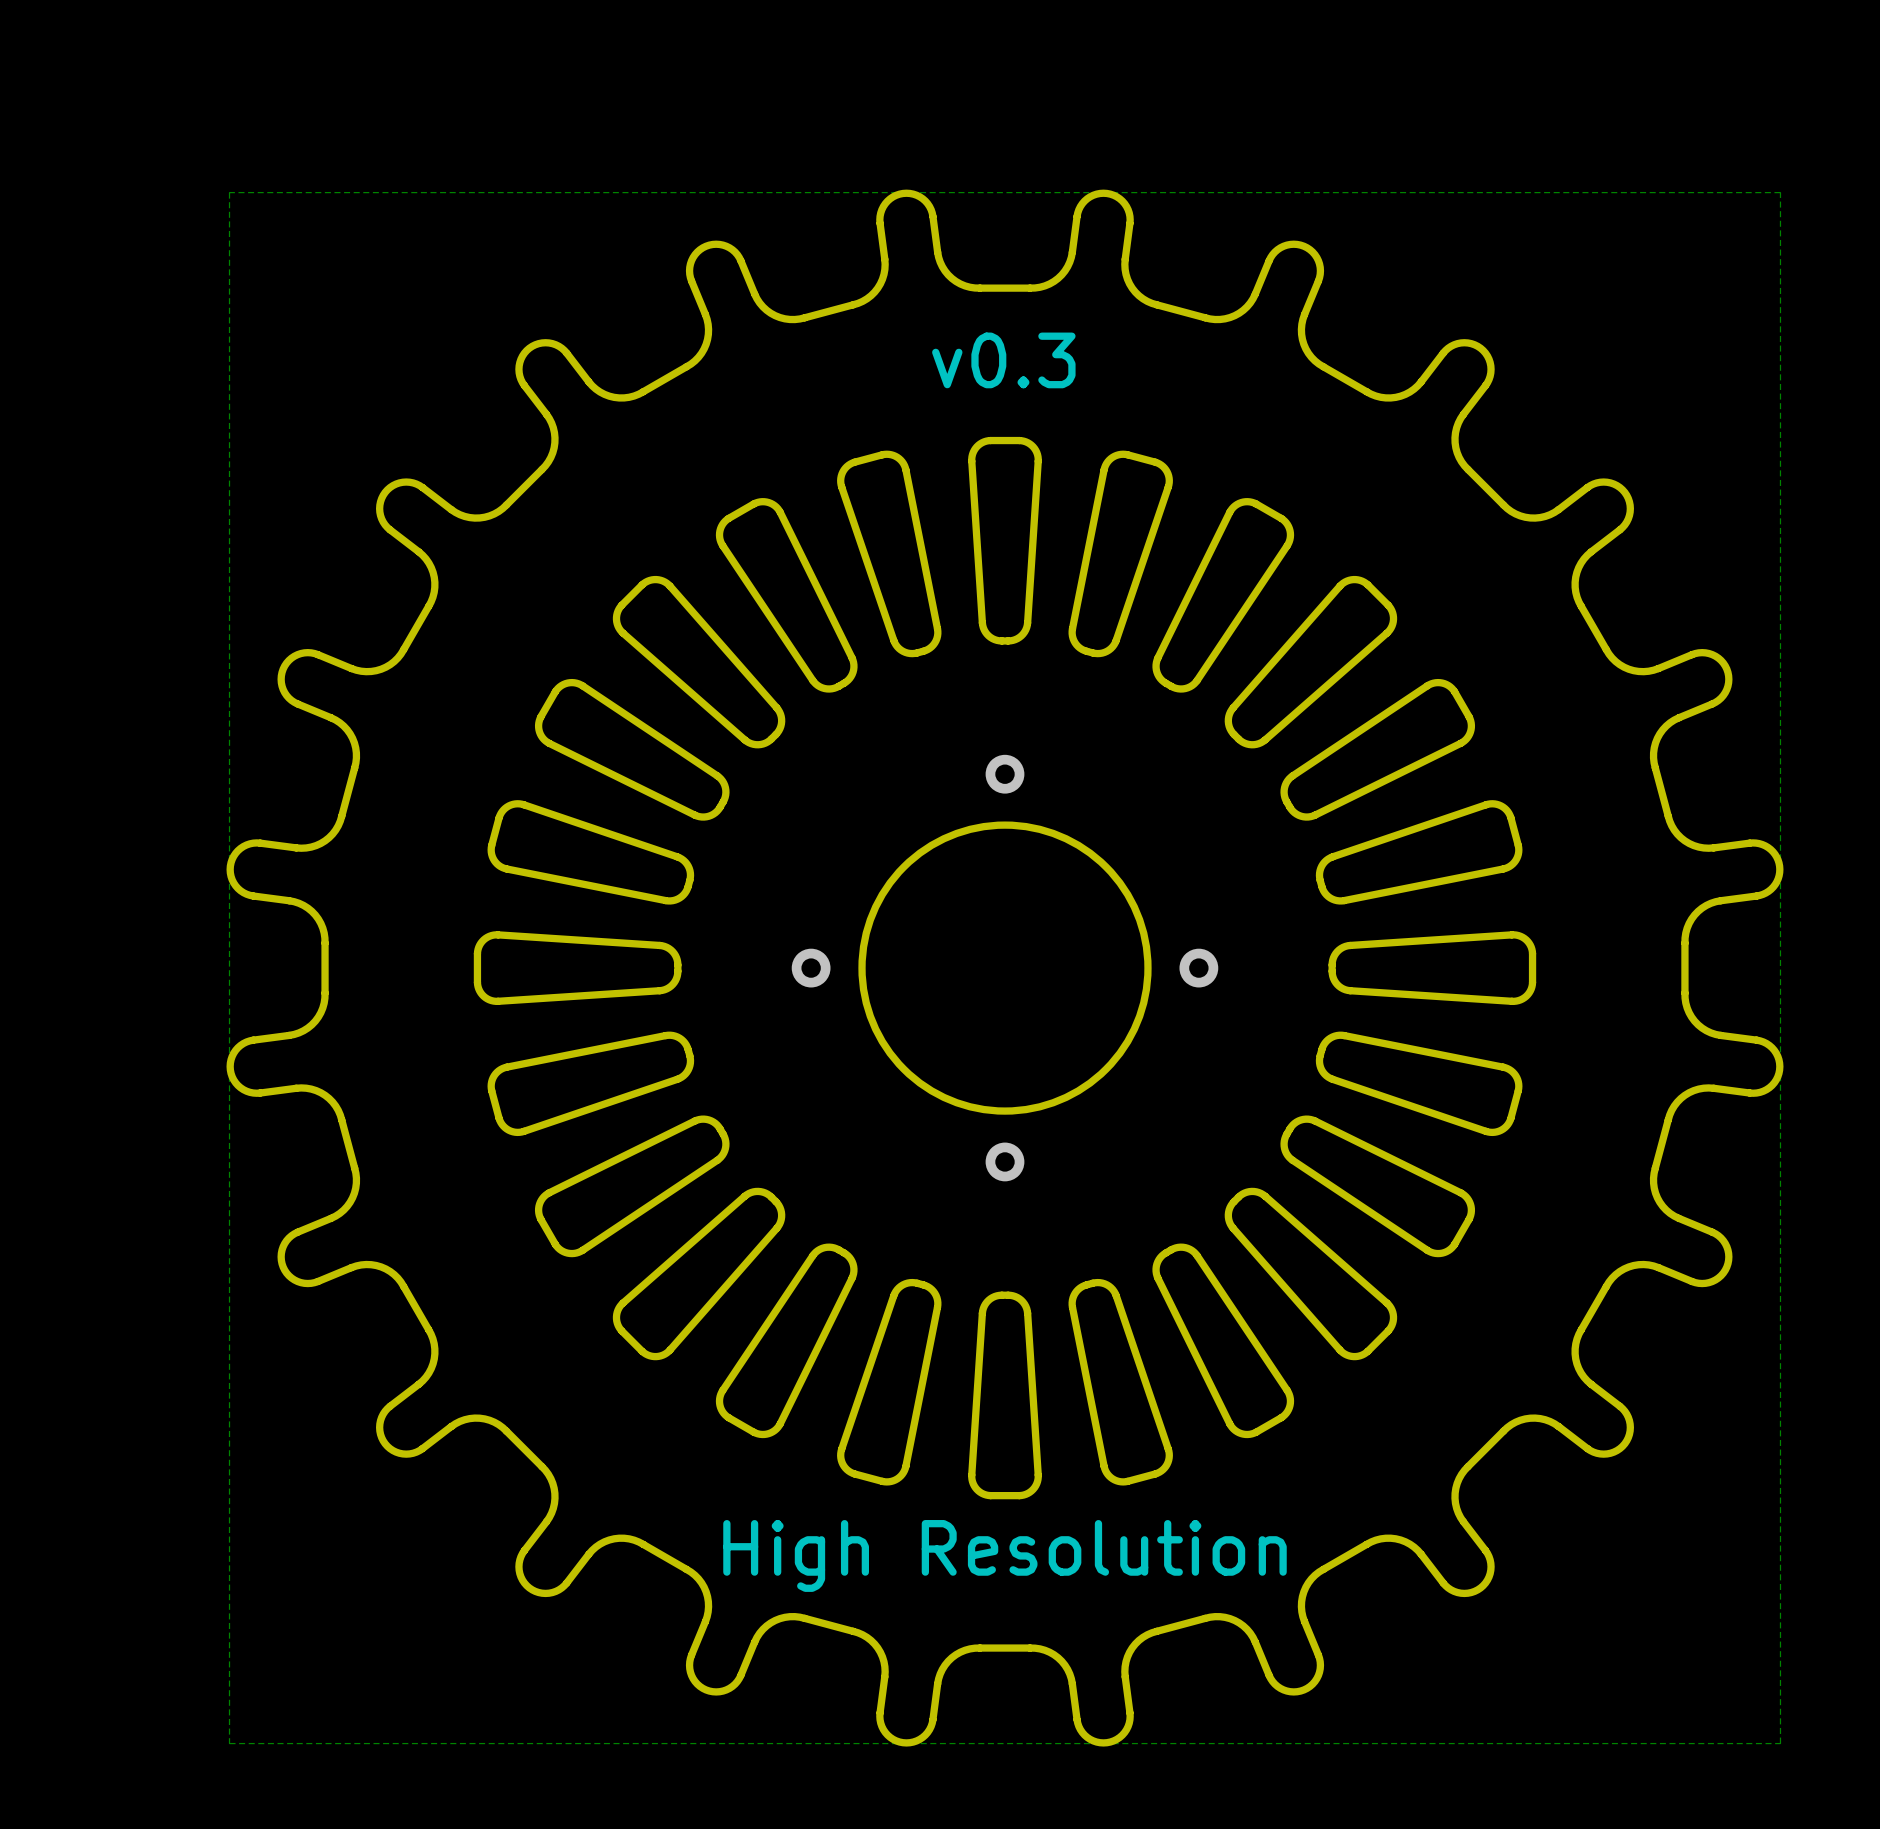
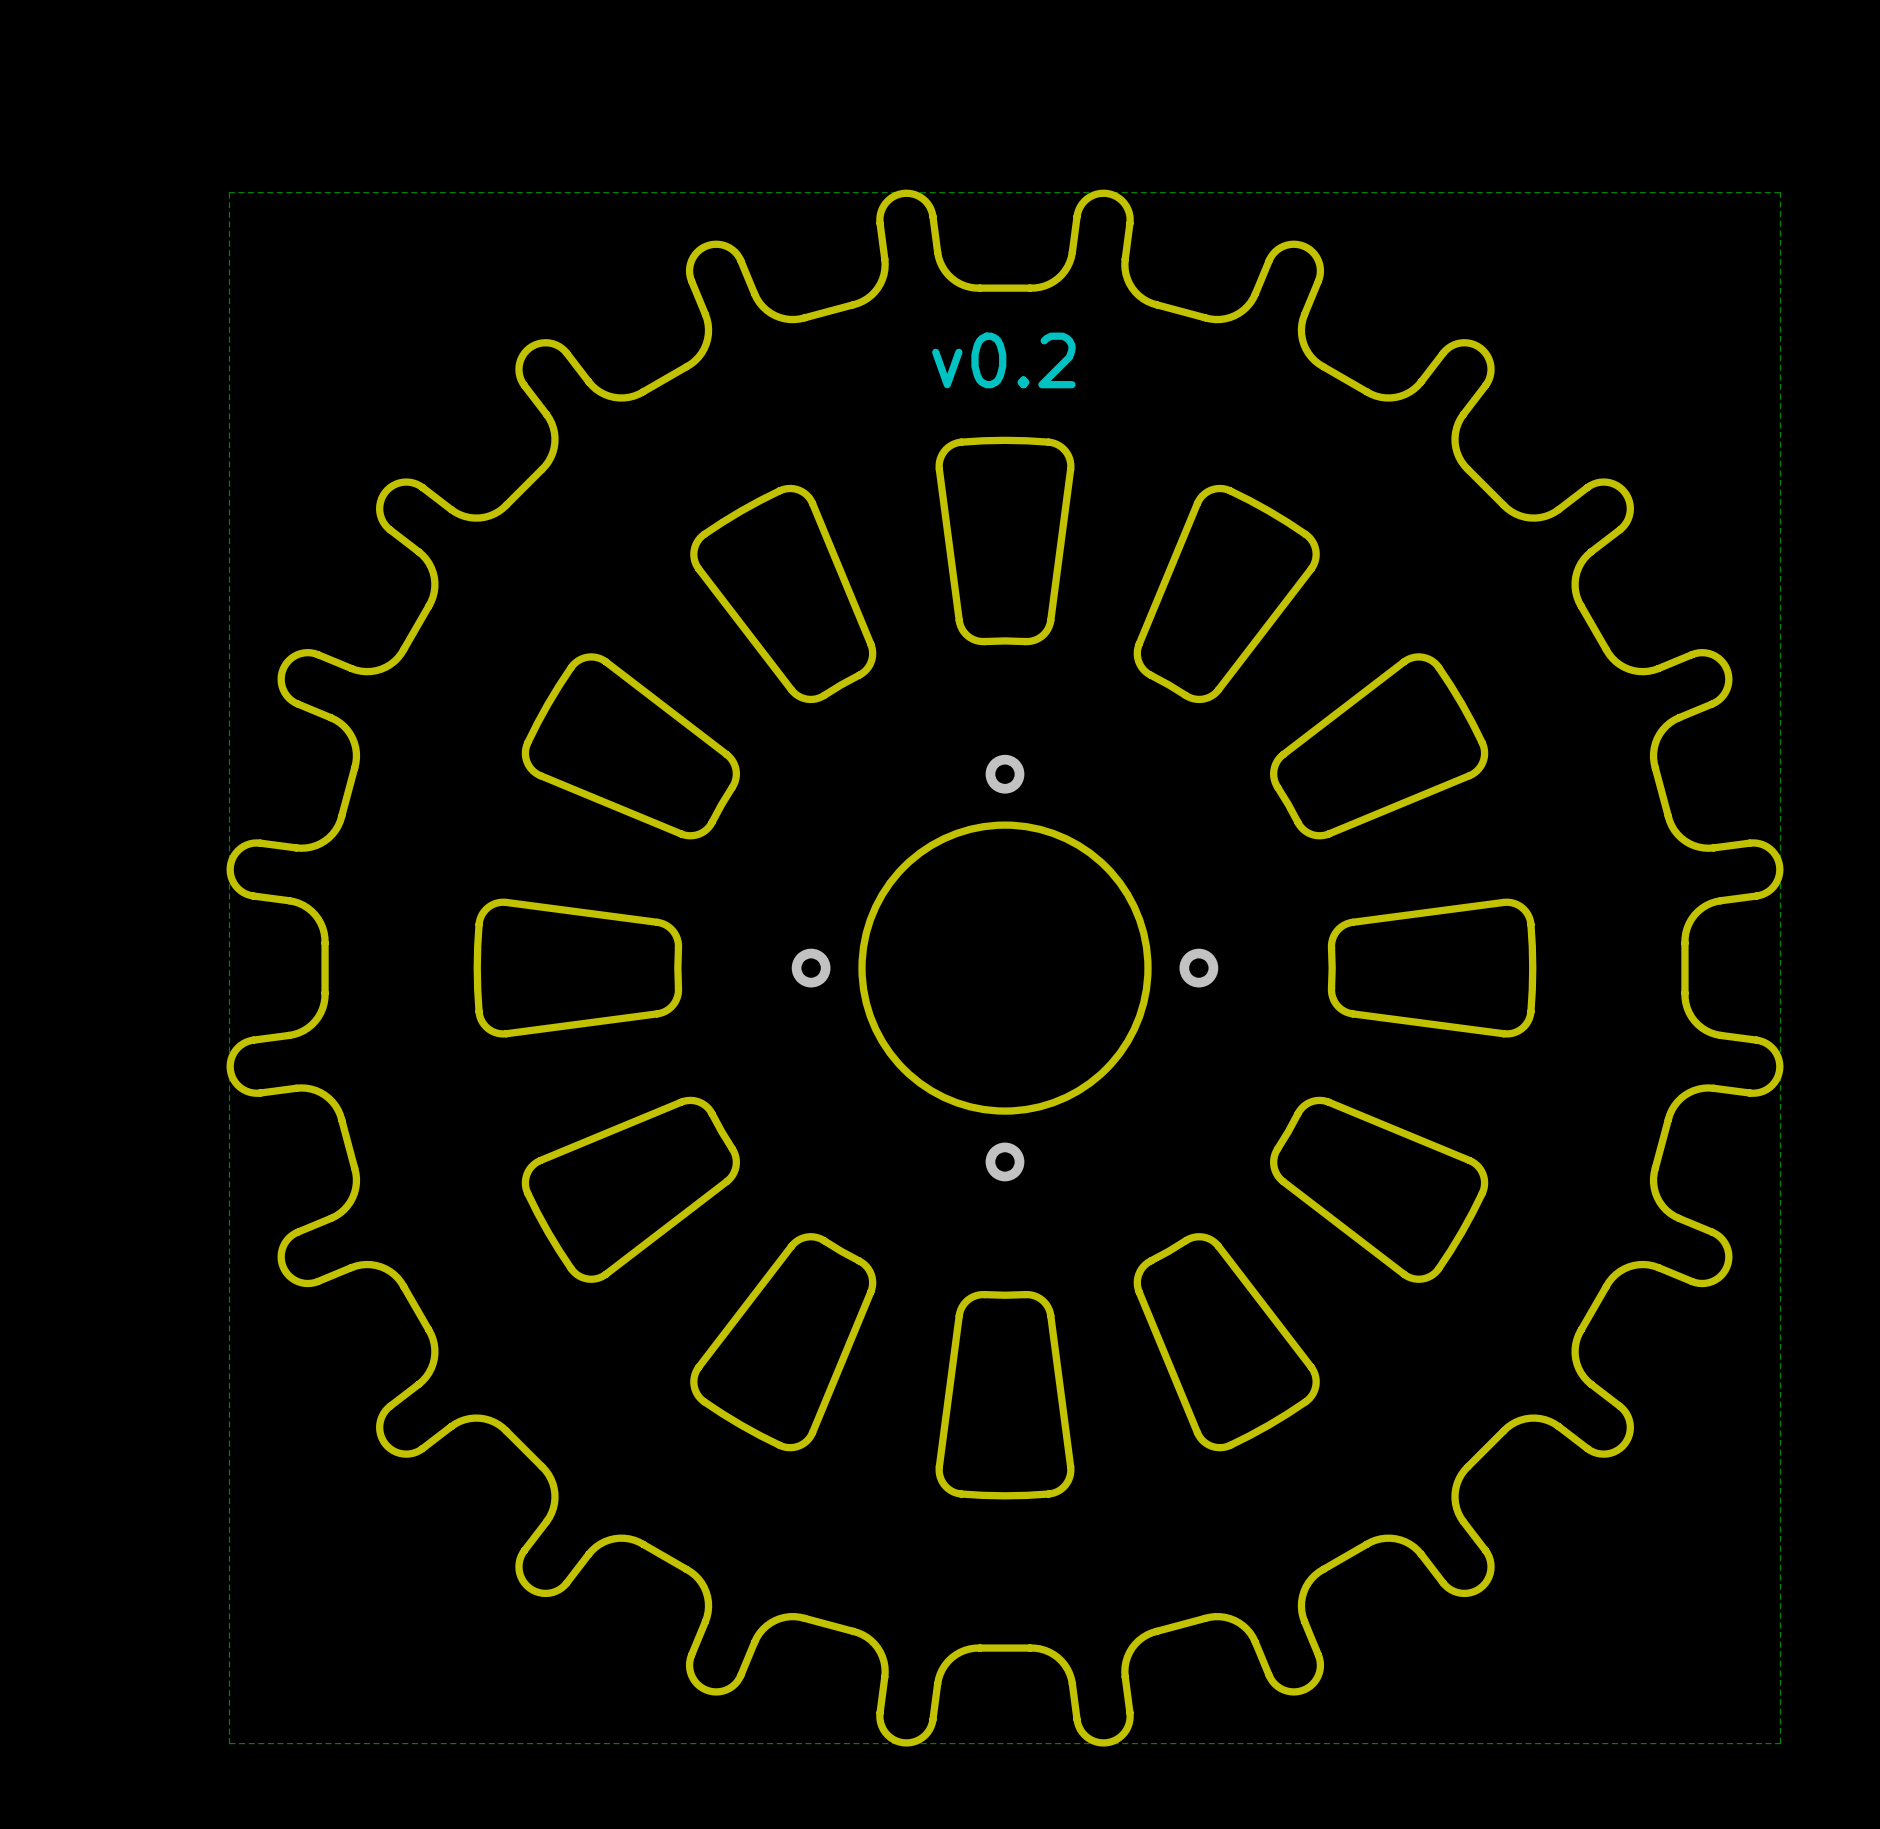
text: v0.3 (1003, 360) -> v0.2 (1003, 360)
board edge: (1019, 440) (984, 441) (975, 448) (971, 458) (982, 625) (988, 635) (999, 640) (1010, 640) (1019, 637) (1025, 629) (1027, 622) (1038, 458) (1036, 452) (1031, 445) (1019, 440) -> (1048, 442) (1026, 440) (1004, 440) (958, 442) (948, 447) (940, 458) (939, 469) (959, 620) (965, 634) (975, 640) (1031, 641) (1042, 636) (1049, 626) (1070, 466) (1069, 458) (1063, 449) (1056, 444) (1051, 442) (1048, 442)
board edge: (882, 454) (848, 465) (841, 473) (841, 484) (894, 642) (903, 651) (914, 653) (925, 650) (933, 644) (937, 636) (937, 628) (905, 467) (900, 460) (895, 456) (882, 454) -> none
board edge: (1127, 454) (1161, 465) (1168, 473) (1168, 484) (1115, 642) (1106, 651) (1095, 653) (1084, 650) (1076, 644) (1072, 636) (1072, 628) (1104, 467) (1107, 461) (1114, 456) (1127, 454) -> none
board edge: (753, 504) (723, 522) (719, 532) (721, 543) (814, 682) (824, 688) (836, 687) (846, 681) (852, 674) (853, 664) (851, 657) (779, 510) (774, 505) (766, 502) (753, 504) -> (779, 490) (796, 489) (803, 492) (811, 500) (872, 650) (871, 661) (864, 671) (815, 698) (803, 698) (791, 689) (698, 569) (694, 558) (694, 547) (702, 536) (741, 511) (779, 490)
board edge: (1256, 504) (1286, 522) (1290, 532) (1288, 543) (1195, 682) (1185, 688) (1173, 687) (1163, 681) (1157, 674) (1156, 664) (1158, 657) (1230, 510) (1241, 502) (1249, 501) (1256, 504) -> (1230, 490) (1213, 489) (1206, 492) (1198, 500) (1137, 650) (1138, 661) (1145, 671) (1194, 698) (1208, 697) (1218, 689) (1311, 569) (1315, 558) (1315, 547) (1307, 536) (1268, 511) (1230, 490)
board edge: (642, 584) (618, 610) (616, 621) (621, 631) (746, 741) (758, 744) (769, 740) (777, 732) (781, 723) (781, 716) (776, 707) (668, 584) (656, 579) (647, 581) (642, 584) -> none
board edge: (1367, 584) (1391, 610) (1393, 621) (1388, 631) (1263, 741) (1251, 744) (1240, 740) (1232, 732) (1228, 723) (1229, 714) (1233, 707) (1341, 584) (1349, 580) (1355, 579) (1367, 584) -> none
board edge: (582, 685) (719, 777) (723, 783) (725, 792) (724, 799) (717, 811) (708, 816) (696, 815) (544, 739) (539, 731) (539, 720) (556, 690) (567, 683) (574, 682) (582, 685) -> (606, 661) (595, 657) (587, 657) (577, 661) (571, 667) (547, 704) (527, 742) (525, 753) (528, 764) (540, 775) (681, 833) (693, 835) (701, 833) (710, 824) (733, 784) (736, 772) (732, 761) (726, 754) (606, 661)
board edge: (1427, 685) (1290, 777) (1285, 785) (1284, 792) (1285, 799) (1292, 811) (1301, 816) (1313, 815) (1465, 739) (1471, 729) (1470, 720) (1453, 690) (1448, 685) (1440, 682) (1427, 685) -> (1403, 661) (1414, 657) (1422, 657) (1430, 659) (1438, 667) (1462, 704) (1482, 742) (1484, 753) (1481, 764) (1469, 775) (1328, 833) (1320, 835) (1308, 833) (1299, 824) (1276, 784) (1273, 772) (1277, 761) (1283, 754) (1403, 661)
board edge: (523, 804) (679, 857) (686, 864) (689, 870) (690, 878) (686, 890) (677, 899) (668, 900) (500, 866) (493, 858) (491, 849) (499, 815) (508, 805) (517, 803) (523, 804) -> none
board edge: (1486, 804) (1330, 857) (1323, 864) (1320, 870) (1319, 878) (1323, 890) (1332, 899) (1341, 900) (1509, 866) (1516, 858) (1518, 849) (1510, 815) (1501, 805) (1494, 803) (1486, 804) -> none
board edge: (498, 934) (662, 945) (670, 949) (675, 955) (677, 962) (677, 976) (670, 986) (662, 990) (491, 1000) (482, 994) (478, 986) (477, 951) (483, 939) (489, 936) (498, 934) -> (506, 902) (495, 903) (488, 907) (482, 913) (479, 924) (477, 968) (479, 1011) (482, 1022) (490, 1030) (506, 1033) (657, 1013) (666, 1011) (674, 1002) (678, 991) (678, 944) (674, 933) (666, 925) (657, 922) (506, 902)
board edge: (1511, 934) (1347, 945) (1339, 949) (1334, 955) (1332, 962) (1332, 976) (1337, 984) (1347, 990) (1518, 1000) (1527, 994) (1531, 986) (1532, 951) (1530, 945) (1524, 938) (1511, 934) -> (1503, 902) (1511, 902) (1521, 907) (1528, 916) (1530, 924) (1532, 968) (1530, 1011) (1527, 1022) (1519, 1030) (1503, 1033) (1352, 1013) (1343, 1011) (1335, 1002) (1331, 991) (1331, 944) (1335, 933) (1343, 925) (1352, 922) (1503, 902)
board edge: (665, 1035) (500, 1069) (493, 1077) (491, 1086) (500, 1122) (508, 1130) (521, 1131) (679, 1078) (686, 1072) (689, 1065) (687, 1047) (677, 1037) (665, 1035) -> none
board edge: (1344, 1035) (1509, 1069) (1516, 1077) (1518, 1086) (1509, 1122) (1501, 1130) (1488, 1131) (1330, 1078) (1323, 1072) (1320, 1065) (1322, 1047) (1332, 1037) (1344, 1035) -> none
board edge: (694, 1121) (544, 1196) (538, 1206) (539, 1215) (558, 1247) (569, 1253) (580, 1251) (719, 1158) (724, 1150) (725, 1143) (718, 1126) (708, 1119) (694, 1121) -> (681, 1102) (695, 1101) (704, 1104) (710, 1111) (735, 1154) (736, 1163) (732, 1174) (726, 1181) (603, 1275) (590, 1279) (579, 1276) (573, 1271) (559, 1250) (527, 1193) (525, 1182) (528, 1171) (540, 1160) (681, 1102)
board edge: (1315, 1121) (1465, 1196) (1470, 1204) (1470, 1215) (1451, 1247) (1442, 1253) (1429, 1251) (1290, 1158) (1286, 1153) (1284, 1143) (1291, 1126) (1301, 1119) (1315, 1121) -> (1328, 1102) (1469, 1160) (1481, 1171) (1484, 1182) (1482, 1193) (1450, 1250) (1436, 1271) (1430, 1276) (1416, 1279) (1406, 1275) (1283, 1181) (1277, 1174) (1273, 1163) (1274, 1154) (1299, 1111) (1305, 1104) (1313, 1101) (1328, 1102)
board edge: (744, 1196) (618, 1308) (616, 1316) (619, 1327) (645, 1353) (658, 1356) (668, 1351) (778, 1226) (781, 1219) (780, 1209) (769, 1195) (755, 1191) (744, 1196) -> none
board edge: (1265, 1196) (1391, 1308) (1393, 1318) (1390, 1327) (1364, 1353) (1353, 1356) (1341, 1351) (1231, 1226) (1228, 1219) (1229, 1209) (1240, 1195) (1251, 1191) (1258, 1192) (1261, 1193) (1265, 1196) -> none
board edge: (838, 1249) (848, 1255) (852, 1261) (853, 1271) (851, 1278) (779, 1425) (768, 1433) (755, 1433) (723, 1413) (719, 1403) (721, 1392) (814, 1253) (824, 1247) (838, 1249) -> (824, 1240) (809, 1236) (801, 1238) (793, 1243) (698, 1367) (694, 1377) (695, 1390) (704, 1401) (741, 1425) (785, 1447) (798, 1446) (811, 1435) (872, 1286) (871, 1274) (864, 1264) (824, 1240)
board edge: (1171, 1249) (1161, 1255) (1157, 1261) (1156, 1271) (1158, 1278) (1230, 1425) (1241, 1433) (1254, 1433) (1286, 1413) (1290, 1403) (1288, 1392) (1195, 1253) (1185, 1247) (1171, 1249) -> (1185, 1240) (1194, 1237) (1203, 1237) (1216, 1243) (1311, 1367) (1315, 1377) (1314, 1390) (1305, 1401) (1268, 1425) (1224, 1447) (1208, 1444) (1198, 1435) (1137, 1286) (1138, 1274) (1145, 1264) (1185, 1240)
board edge: (917, 1283) (927, 1286) (933, 1291) (937, 1300) (937, 1307) (905, 1468) (897, 1478) (884, 1481) (848, 1470) (841, 1462) (841, 1451) (894, 1293) (903, 1284) (917, 1283) -> none
board edge: (1092, 1283) (1082, 1286) (1076, 1291) (1072, 1300) (1072, 1307) (1104, 1468) (1112, 1478) (1125, 1481) (1161, 1470) (1168, 1462) (1168, 1451) (1115, 1293) (1106, 1284) (1092, 1283) -> none
board edge: (1008, 1295) (997, 1295) (990, 1298) (984, 1306) (982, 1313) (971, 1477) (976, 1489) (988, 1495) (1025, 1494) (1034, 1487) (1038, 1477) (1027, 1310) (1019, 1298) (1008, 1295) -> (1025, 1294) (1039, 1298) (1046, 1304) (1050, 1312) (1070, 1466) (1069, 1477) (1061, 1489) (1048, 1494) (1004, 1495) (955, 1492) (942, 1482) (939, 1469) (960, 1309) (967, 1300) (978, 1295) (1025, 1294)
text: High Resolution (1004, 1555) -> none

